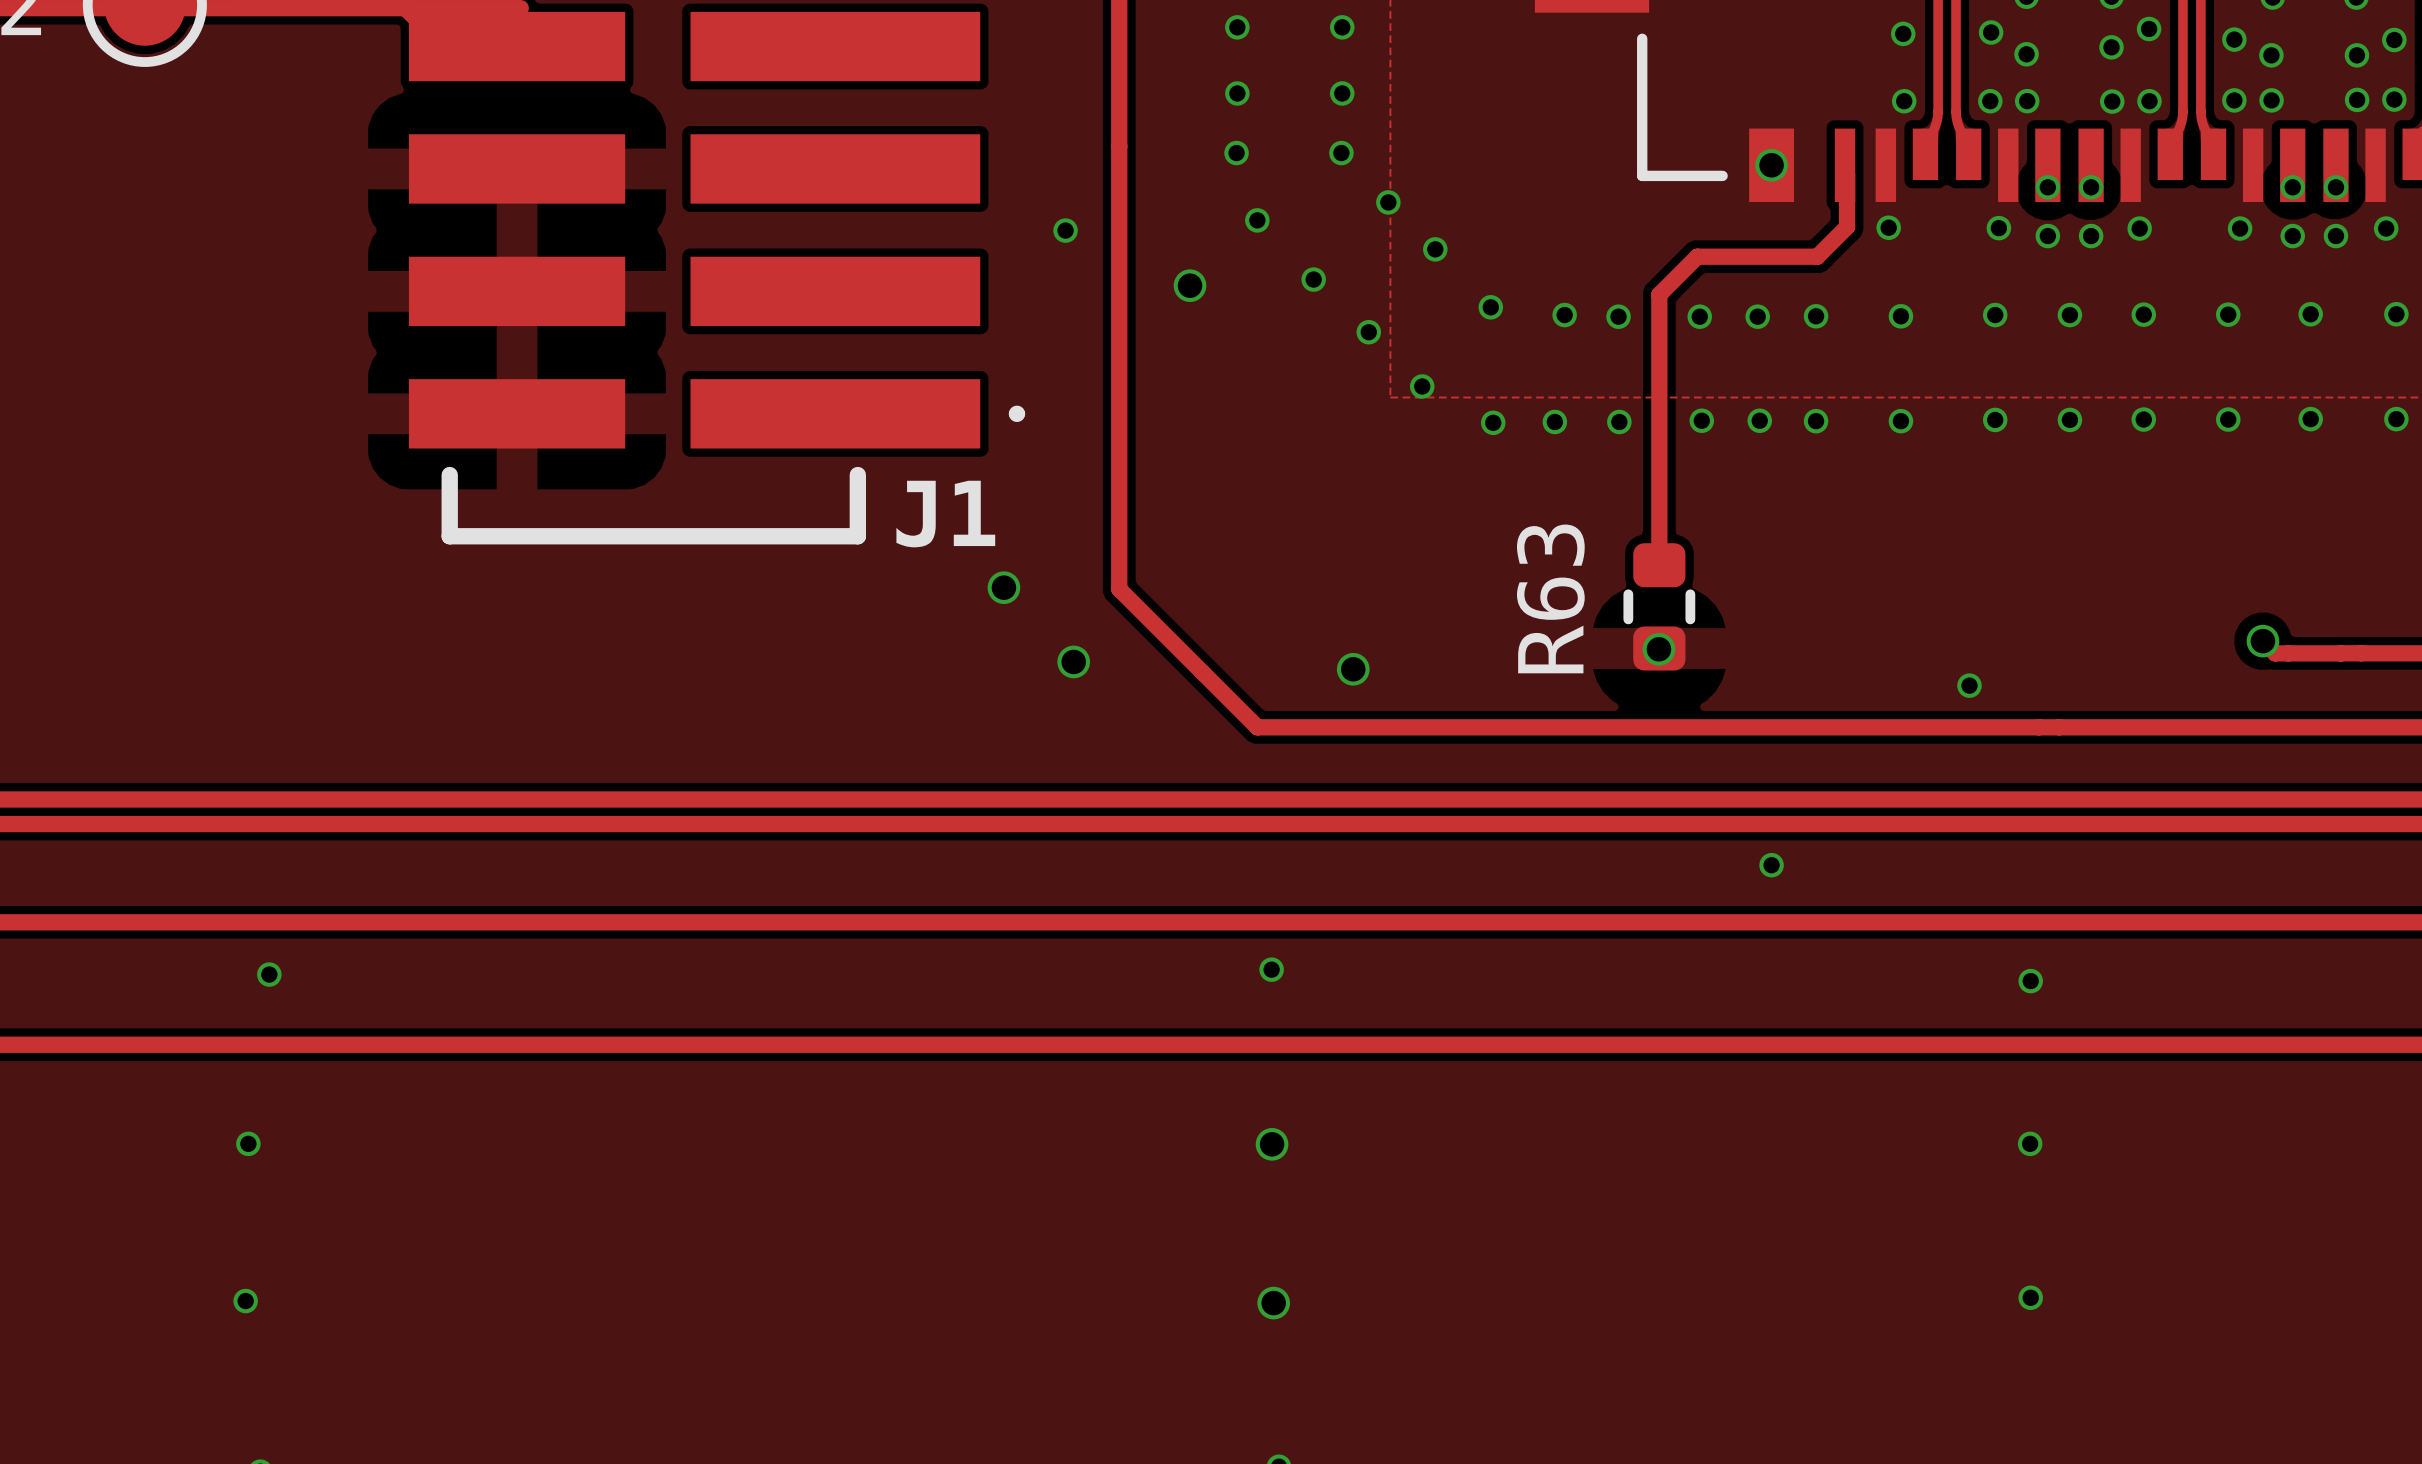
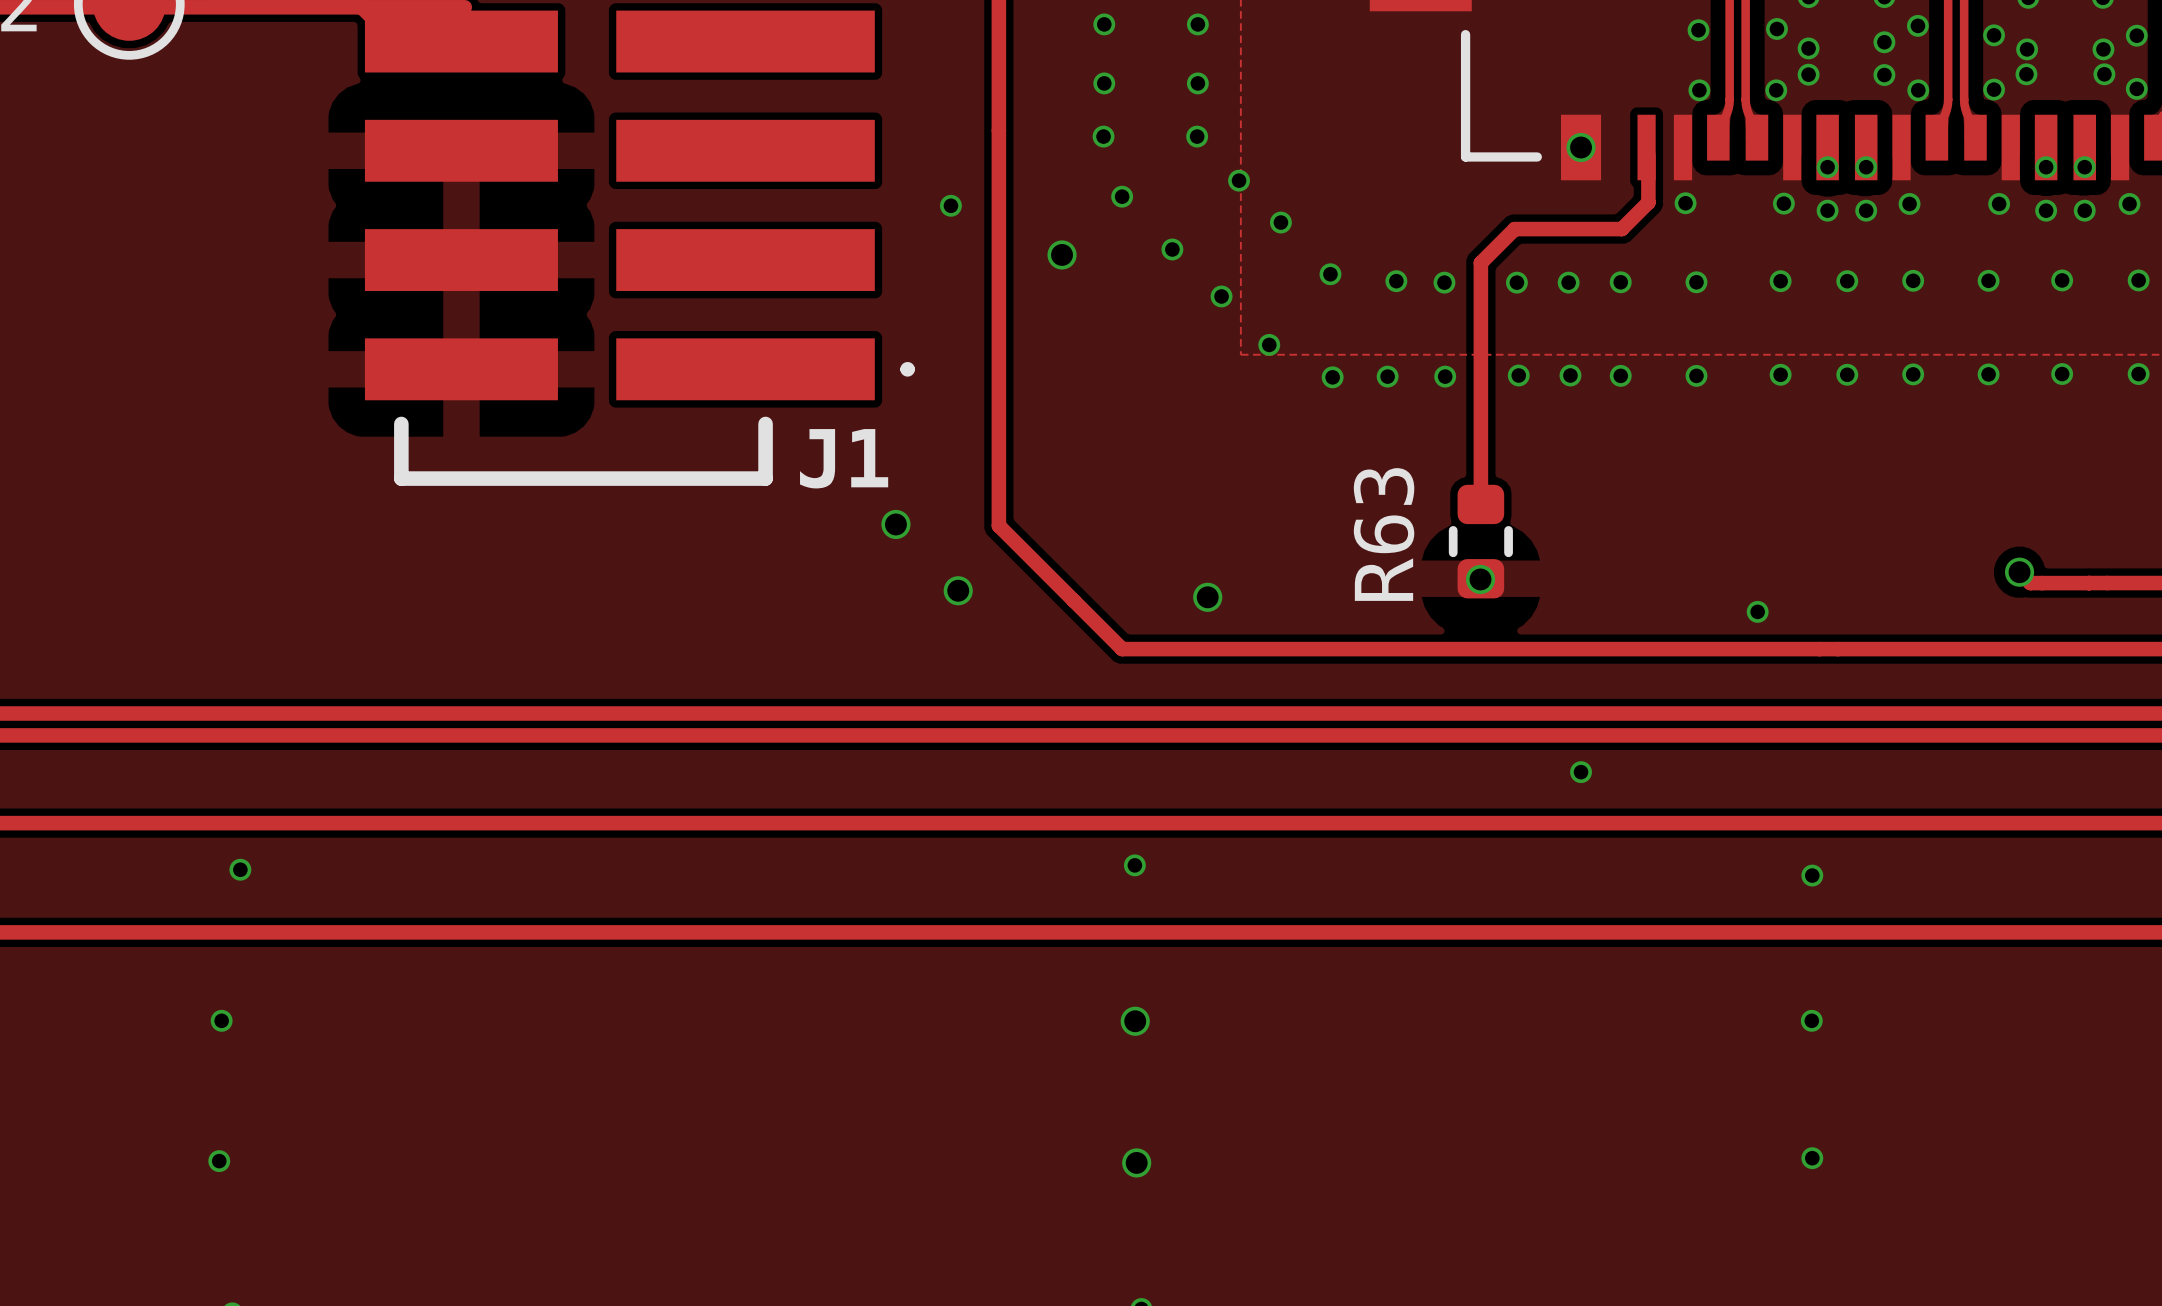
via position: (2357, 99) -> (2104, 74)
via position: (2271, 100) -> (2026, 74)
via position: (2027, 101) -> (1808, 74)
via position: (2112, 101) -> (1884, 75)

